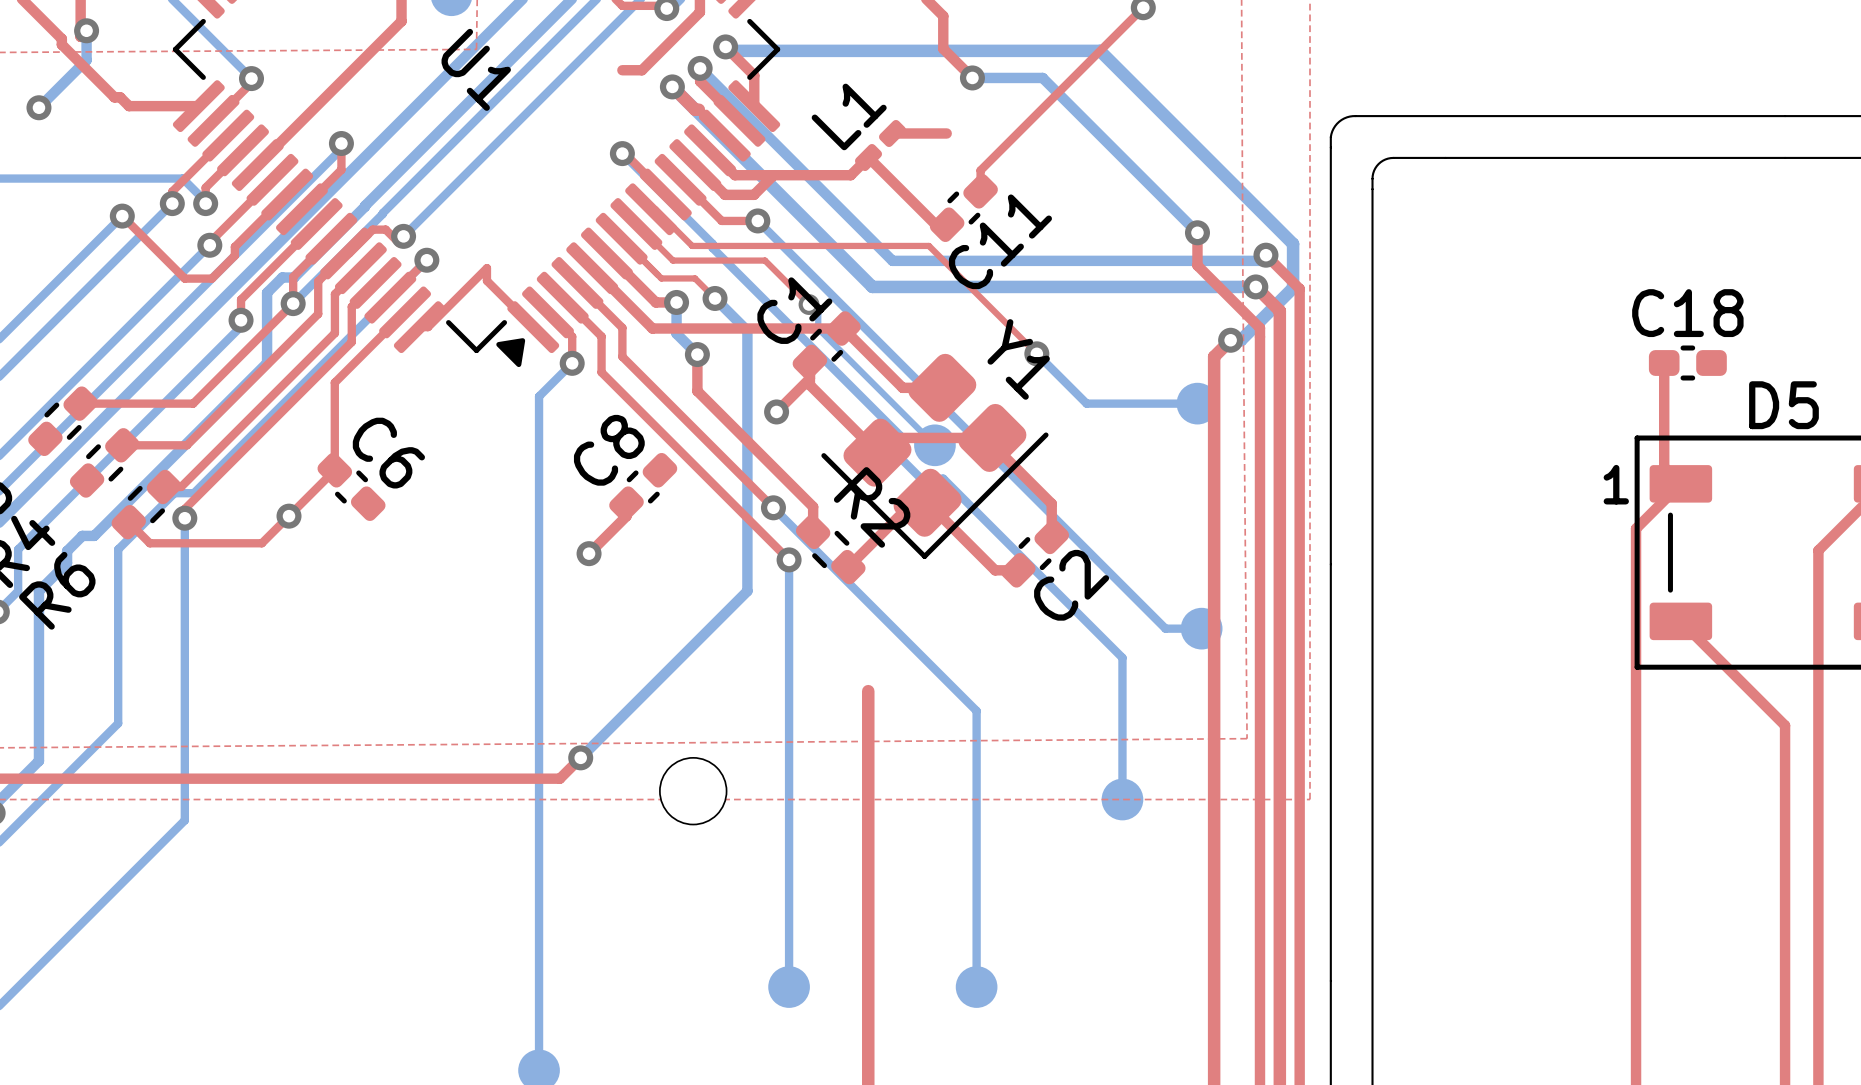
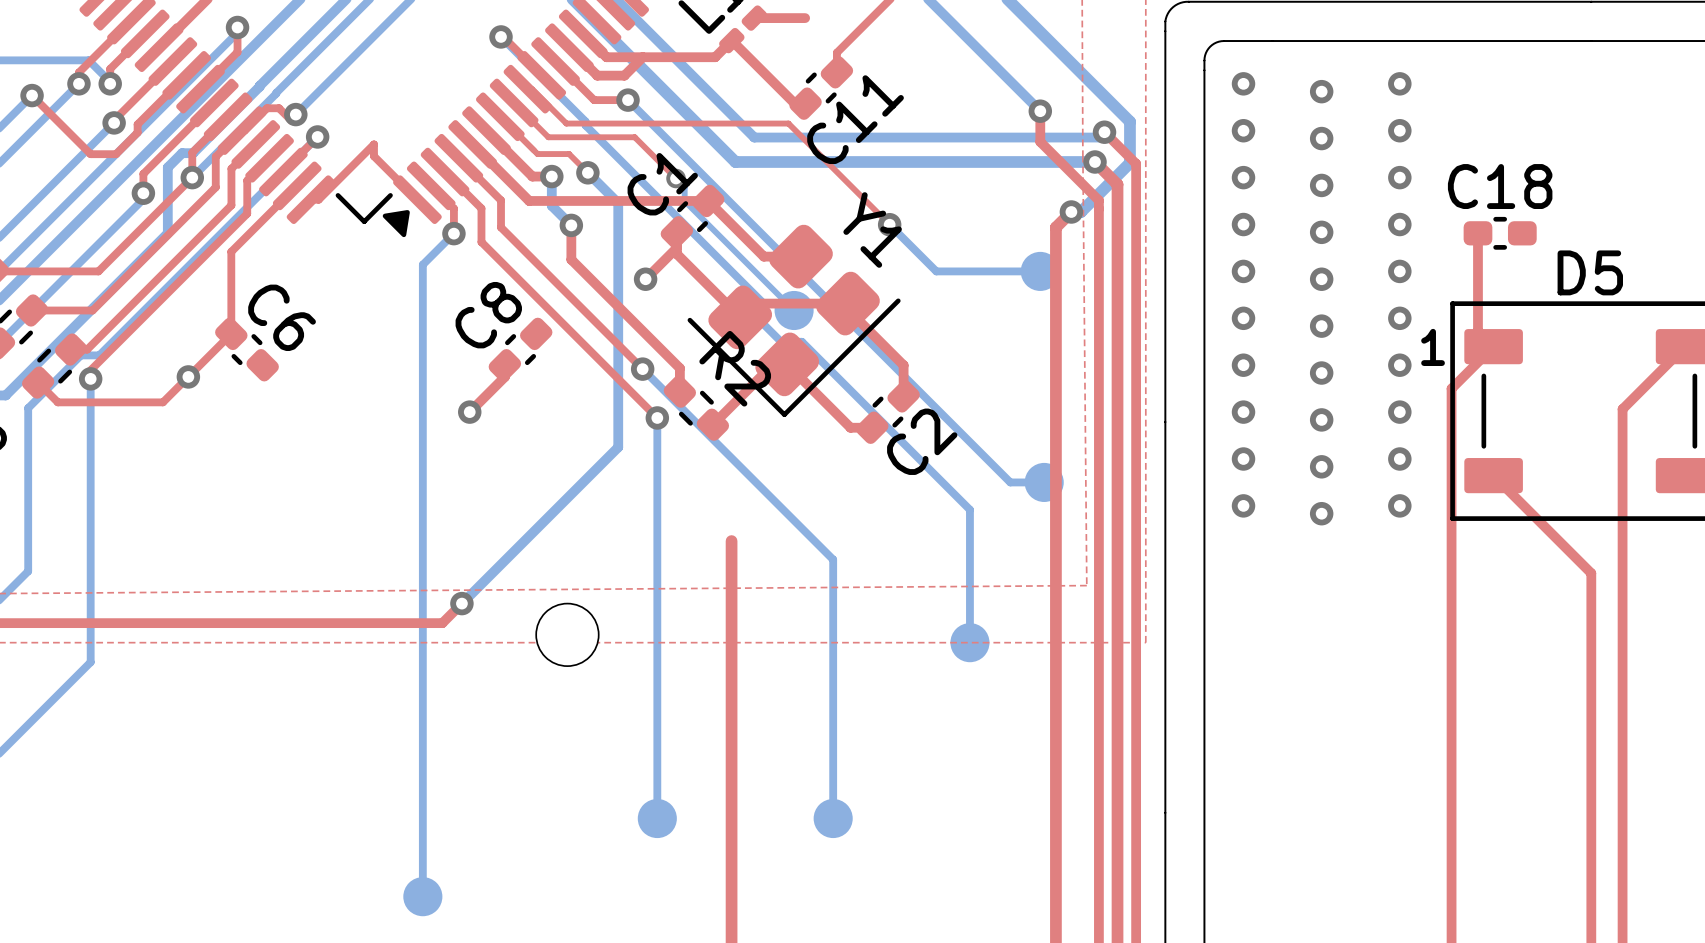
via: none -> (1243, 83)
via: none -> (1399, 83)
via: none -> (1321, 91)
via: none -> (1243, 130)
via: none -> (1399, 130)
via: none -> (1321, 138)
via: none -> (1243, 177)
via: none -> (1399, 177)
via: none -> (1321, 185)
via: none -> (1243, 224)
via: none -> (1399, 224)
via: none -> (1321, 232)
via: none -> (1243, 271)
via: none -> (1399, 271)
via: none -> (1321, 279)
via: none -> (1243, 318)
via: none -> (1399, 318)
via: none -> (1321, 326)
via: none -> (1243, 365)
via: none -> (1399, 365)
via: none -> (1321, 373)
via: none -> (1243, 412)
via: none -> (1399, 412)
via: none -> (1321, 419)
via: none -> (1243, 459)
via: none -> (1399, 459)
via: none -> (1321, 466)
via: none -> (1243, 505)
via: none -> (1399, 505)
via: none -> (1321, 513)

